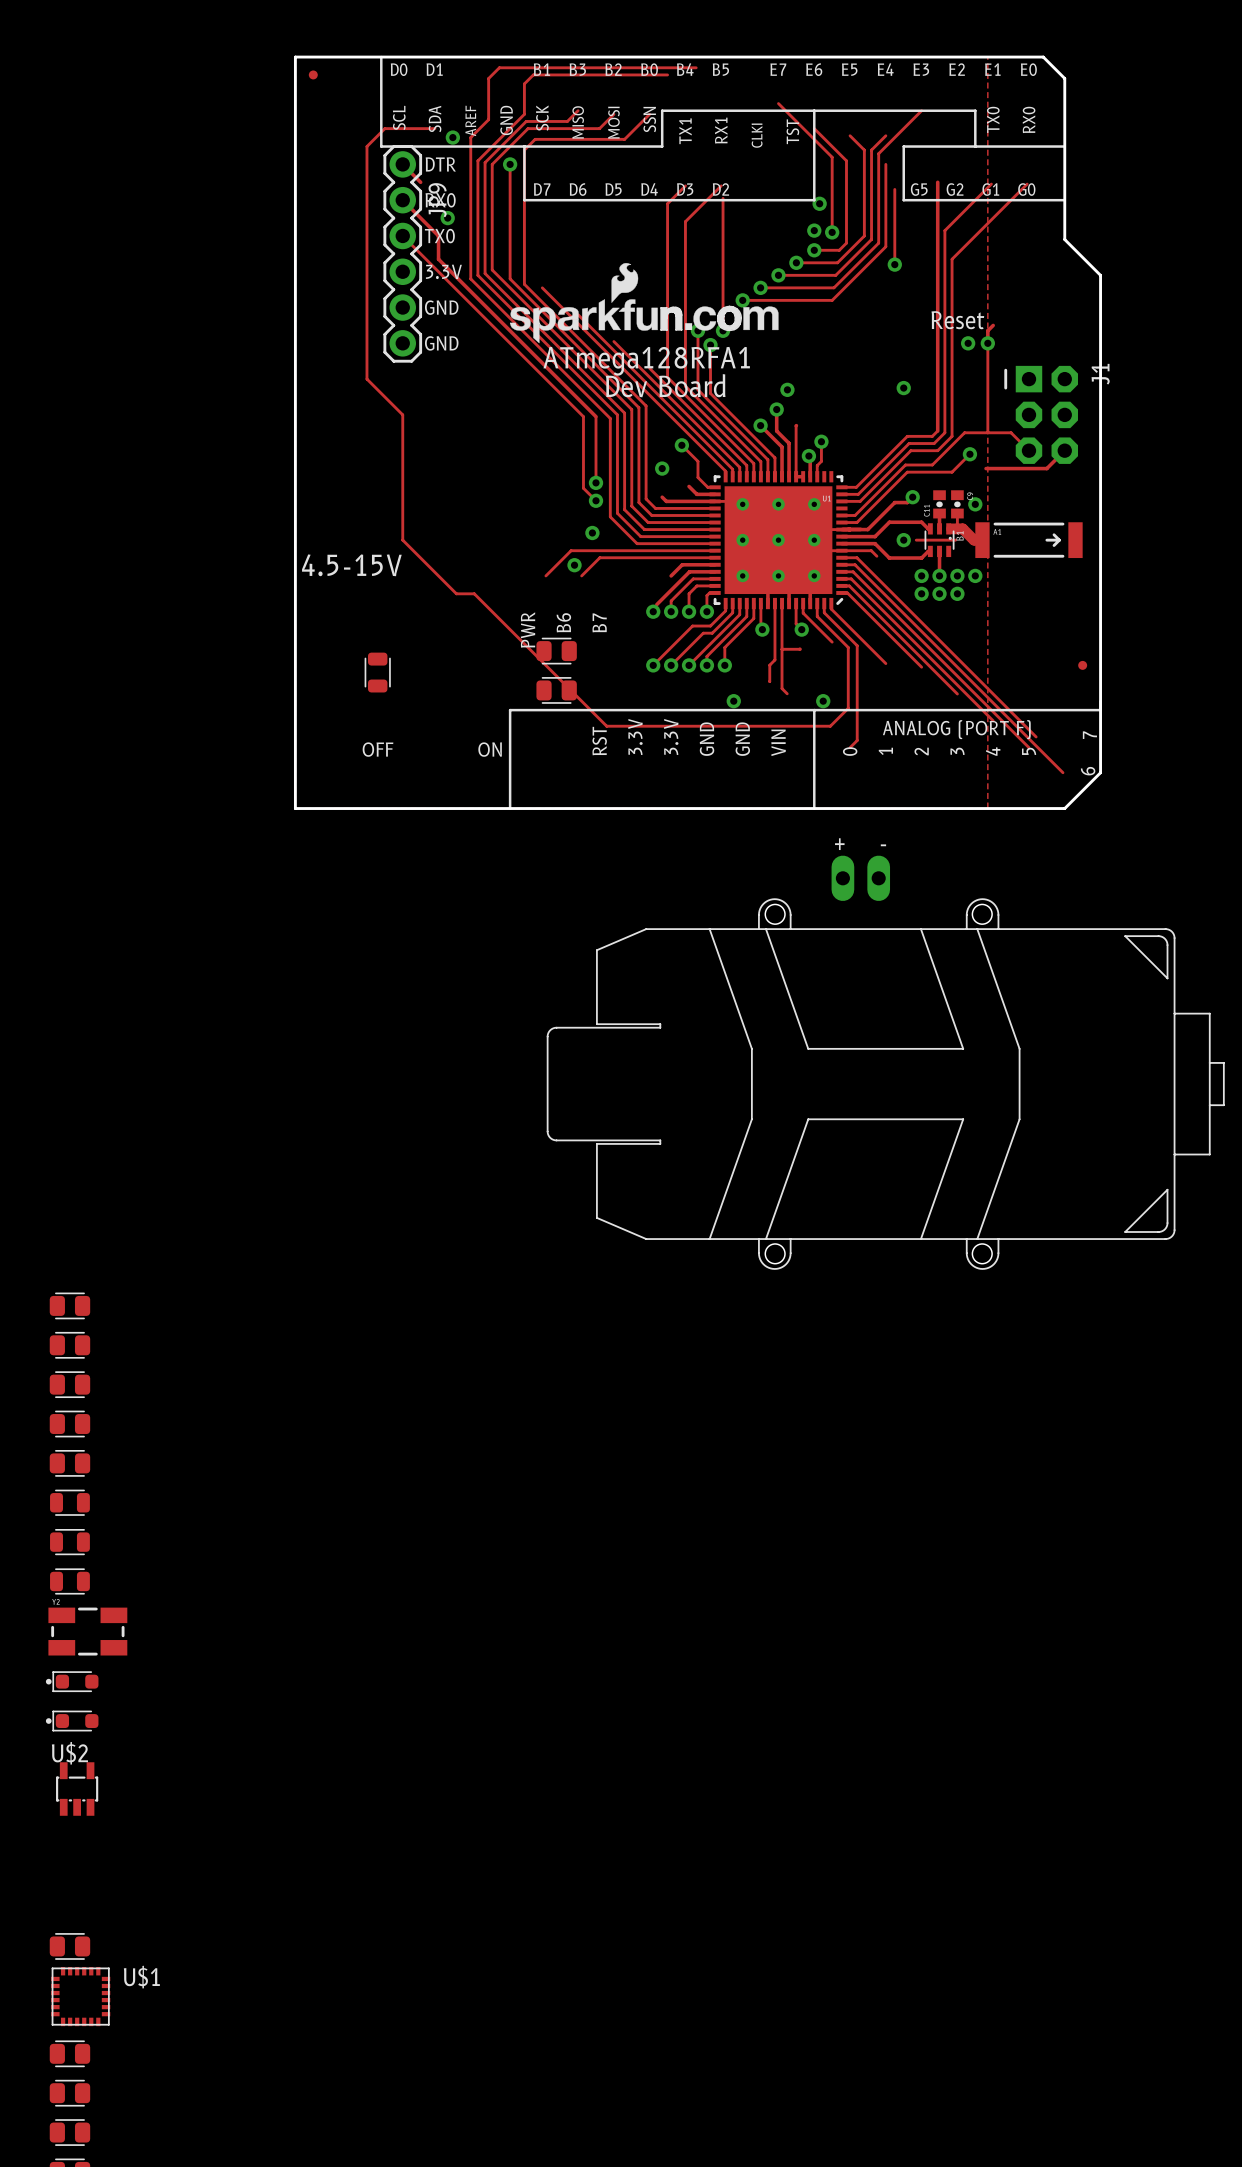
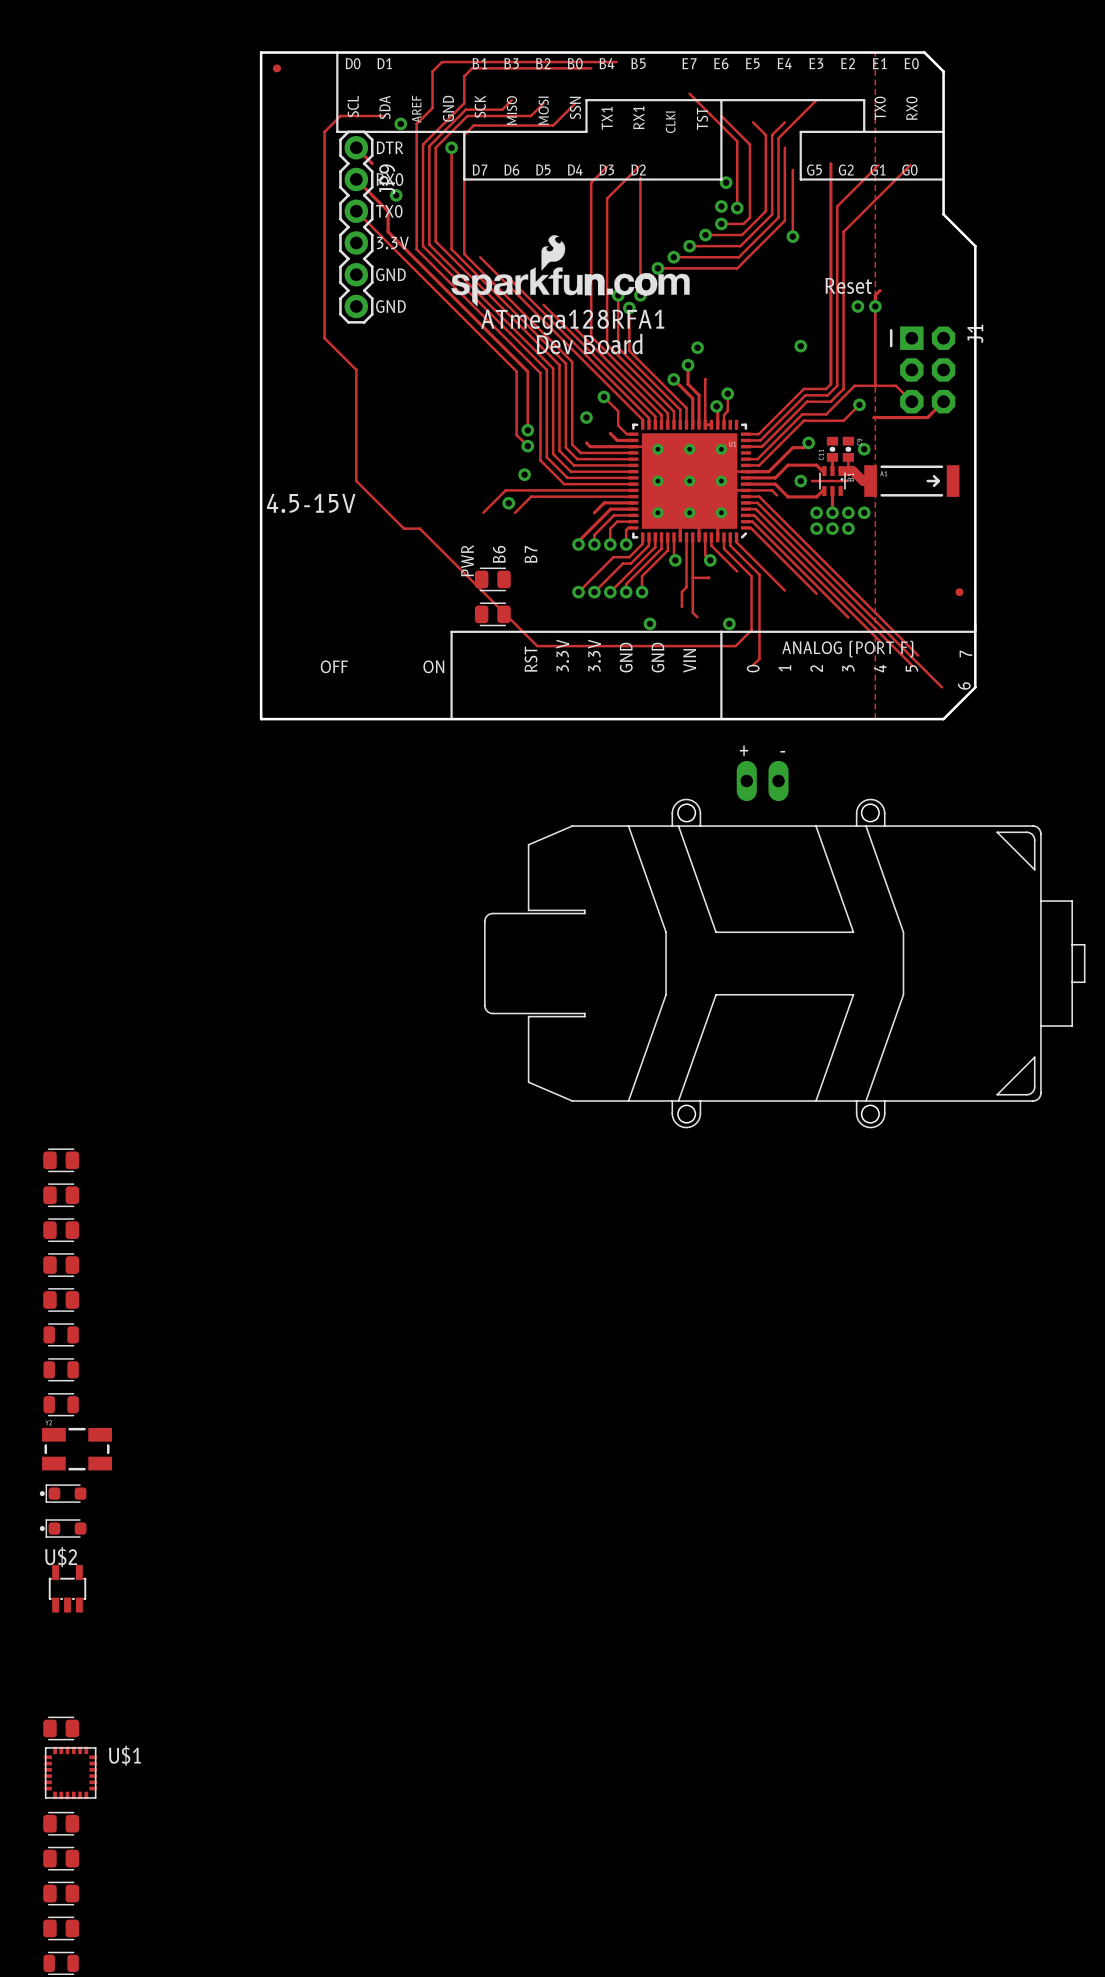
part: (377, 672) -> none

